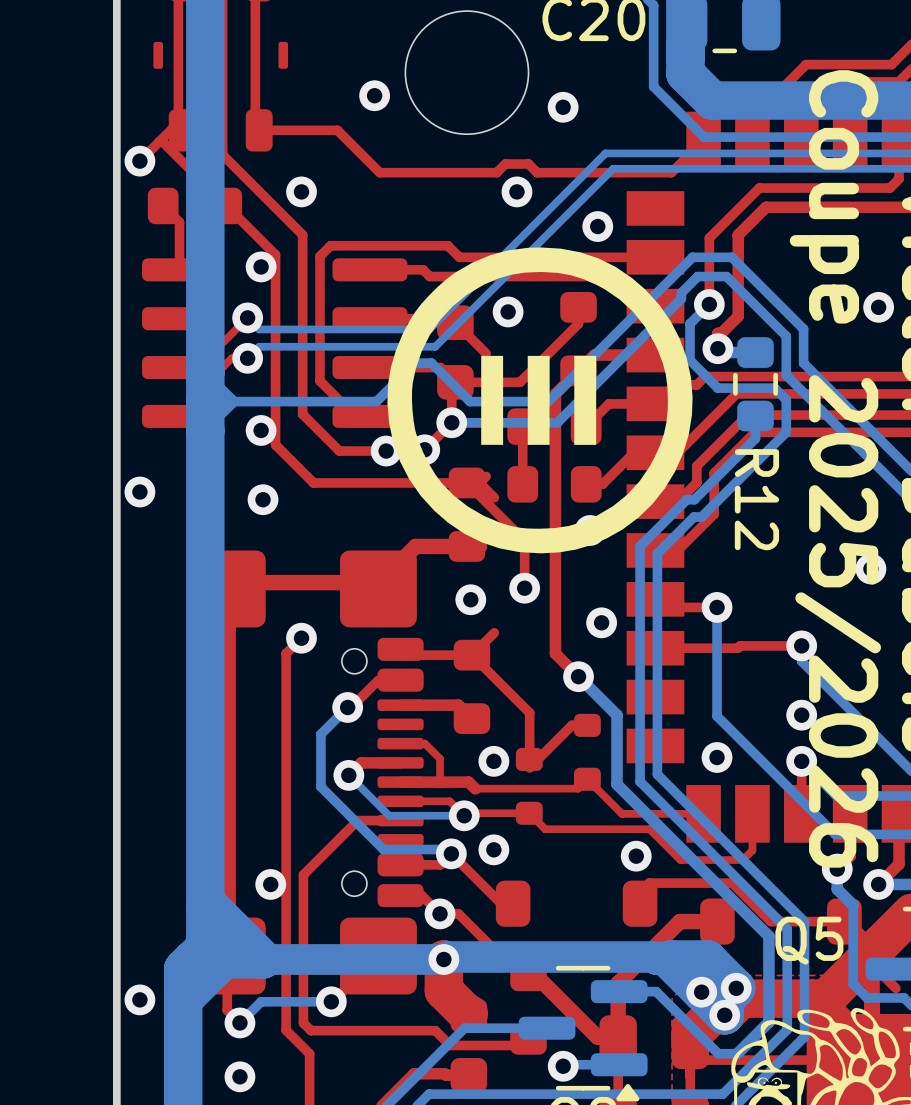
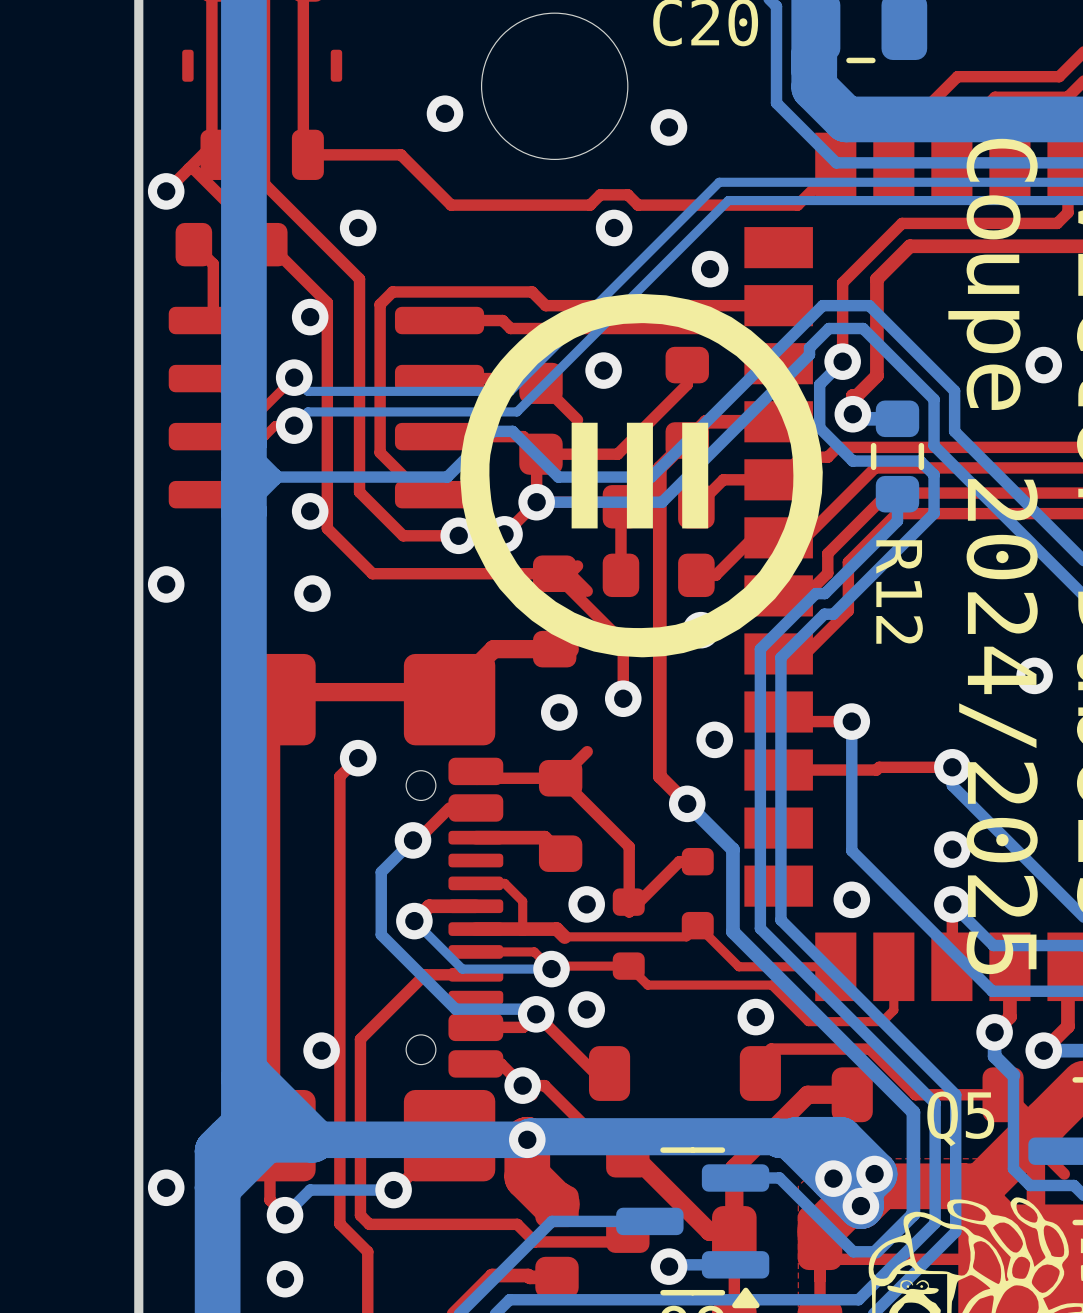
text: Coupe 2025/2026 (835, 468) -> Coupe 2024/2025 (993, 556)

